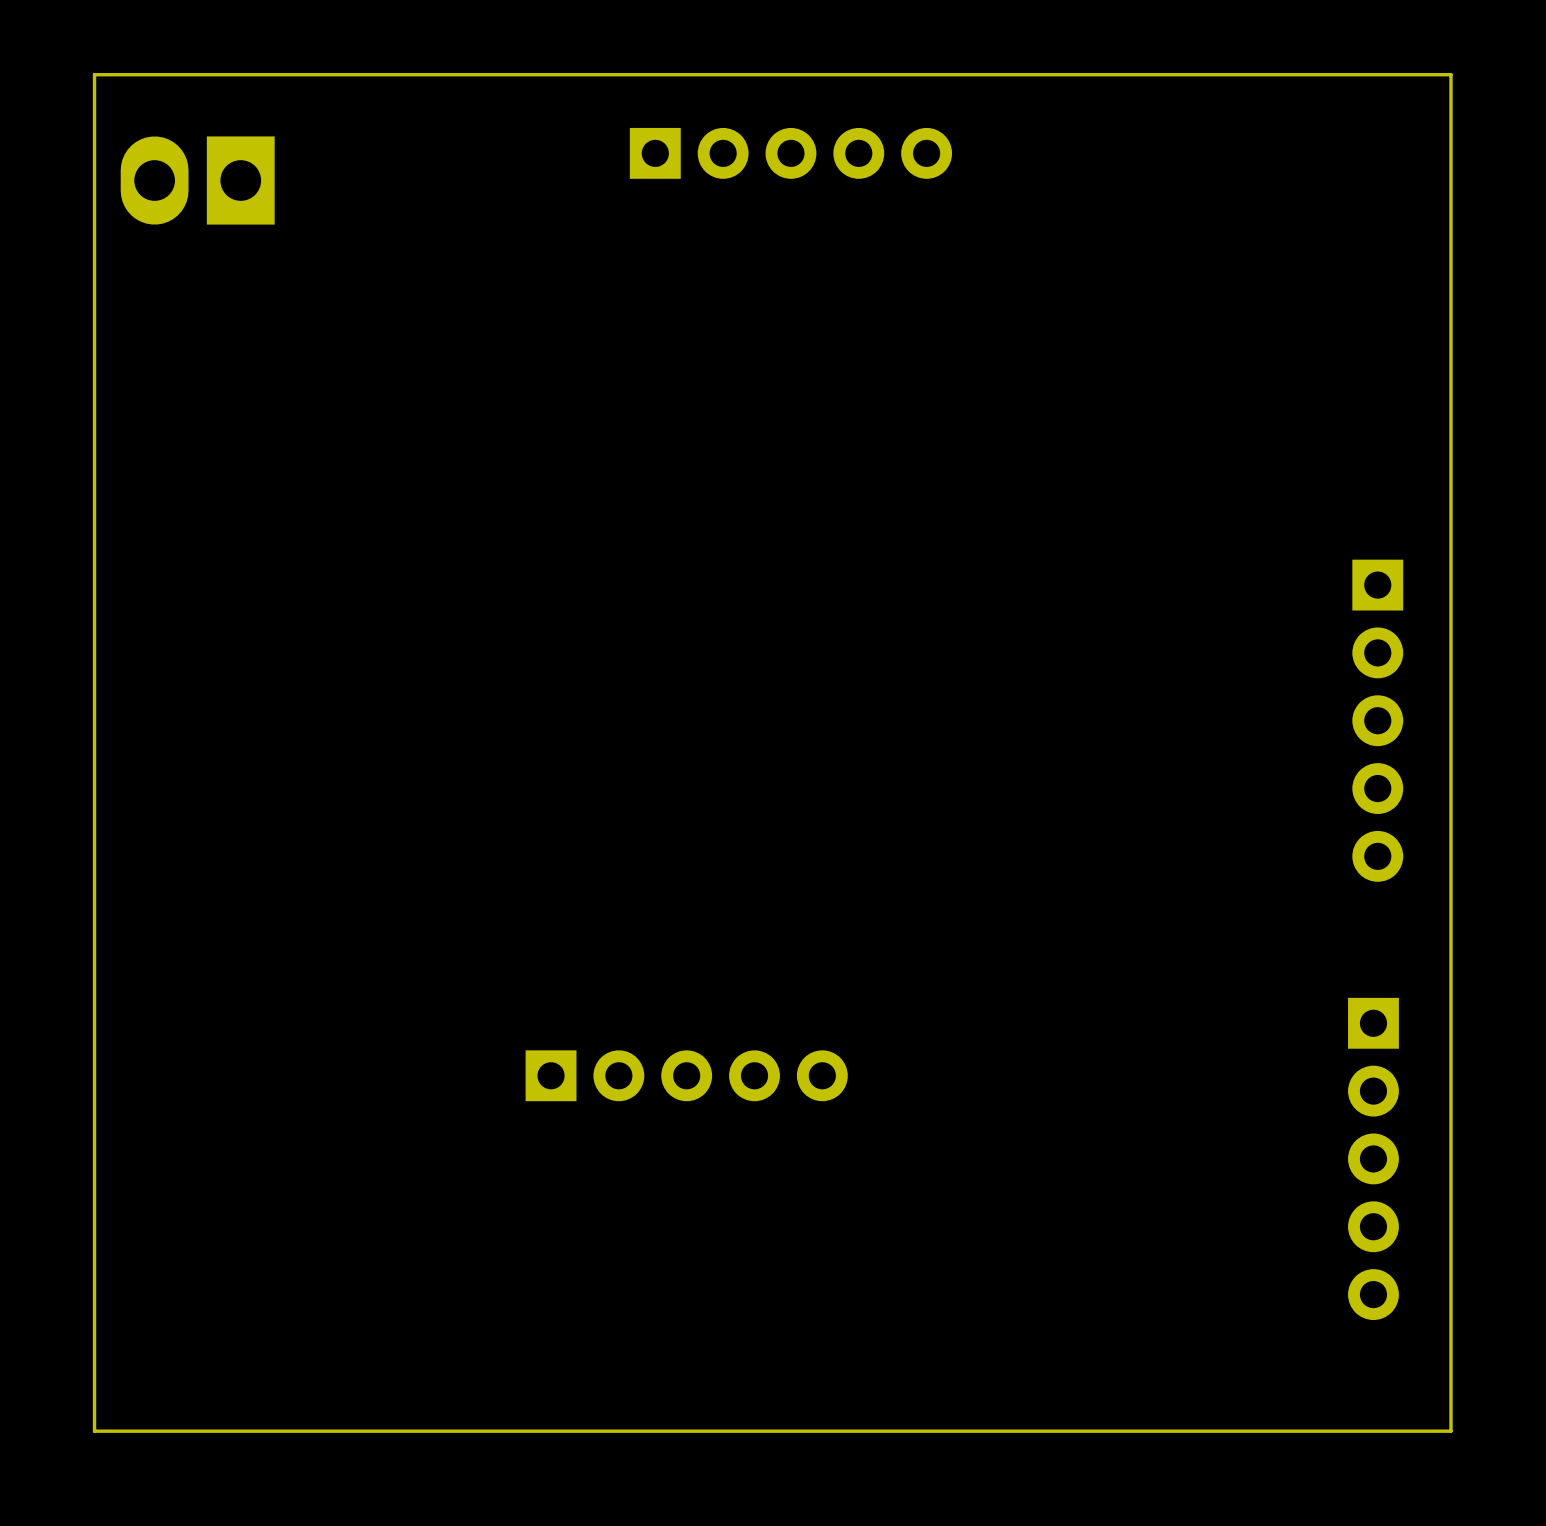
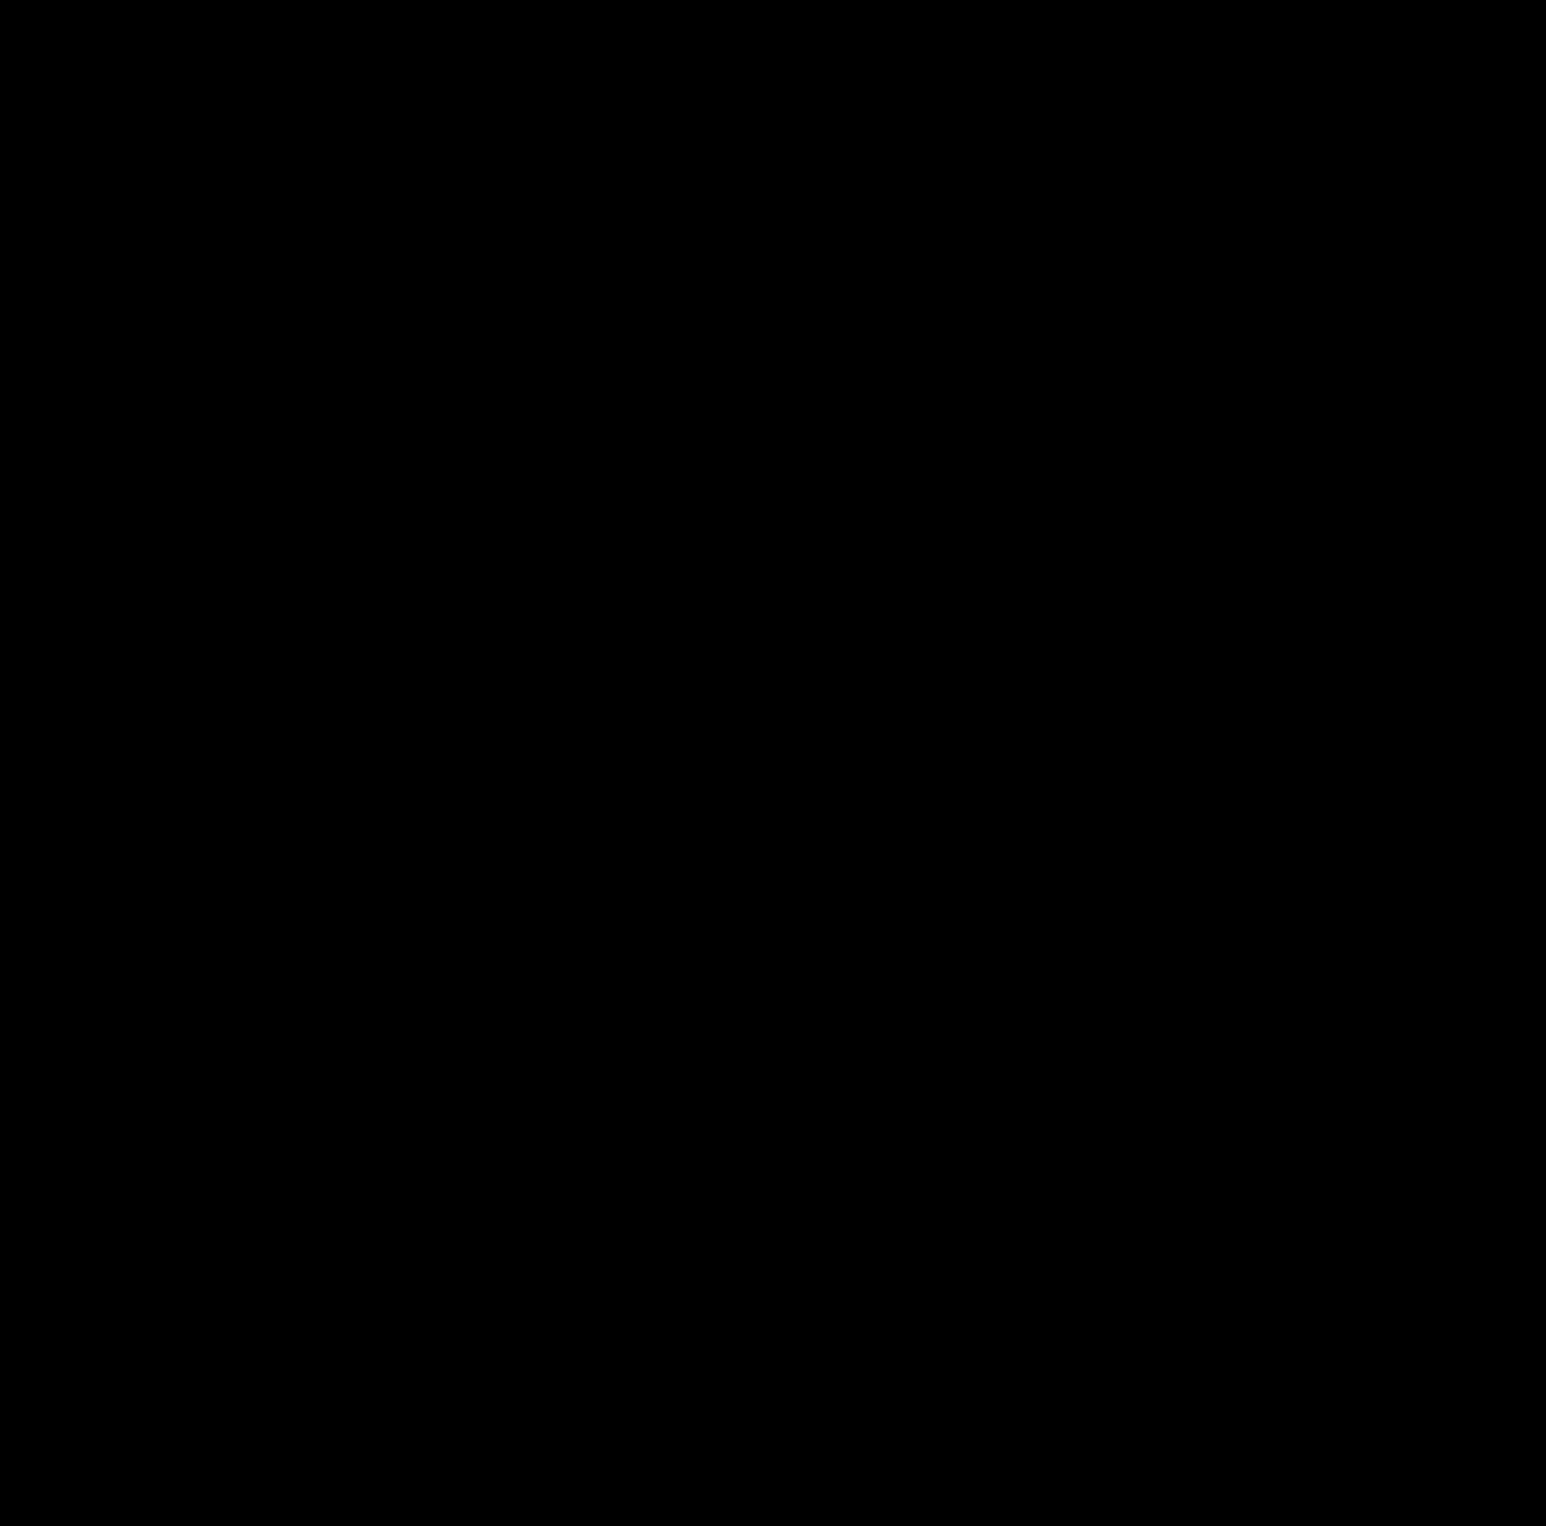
board edge: (1450, 74) (94, 74) (94, 1431) (1450, 1431) (1450, 74) -> none
part: (790, 153) -> none
part: (197, 180) -> none
part: (1377, 720) -> none
part: (686, 1075) -> none
part: (1373, 1158) -> none

